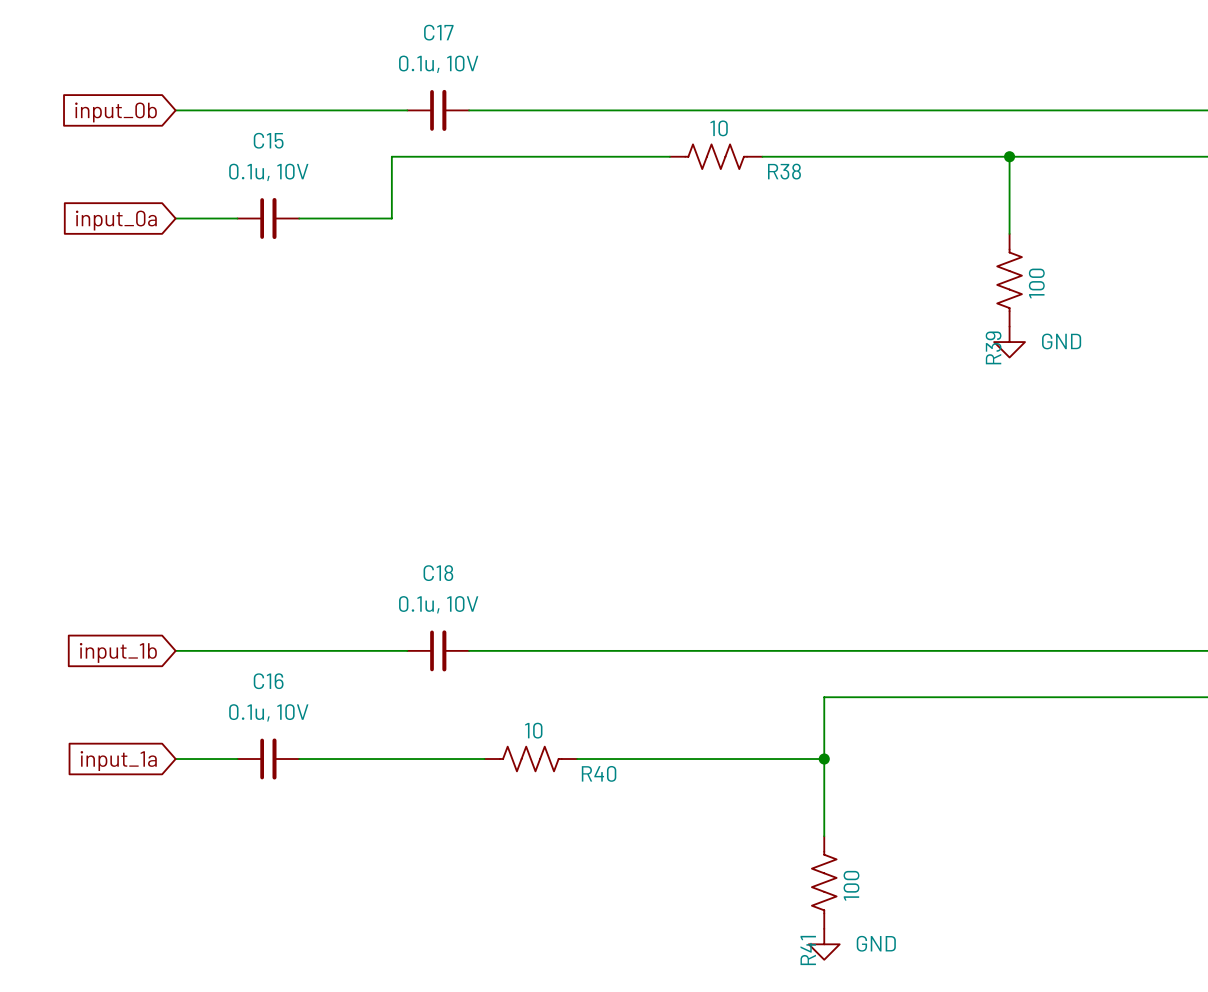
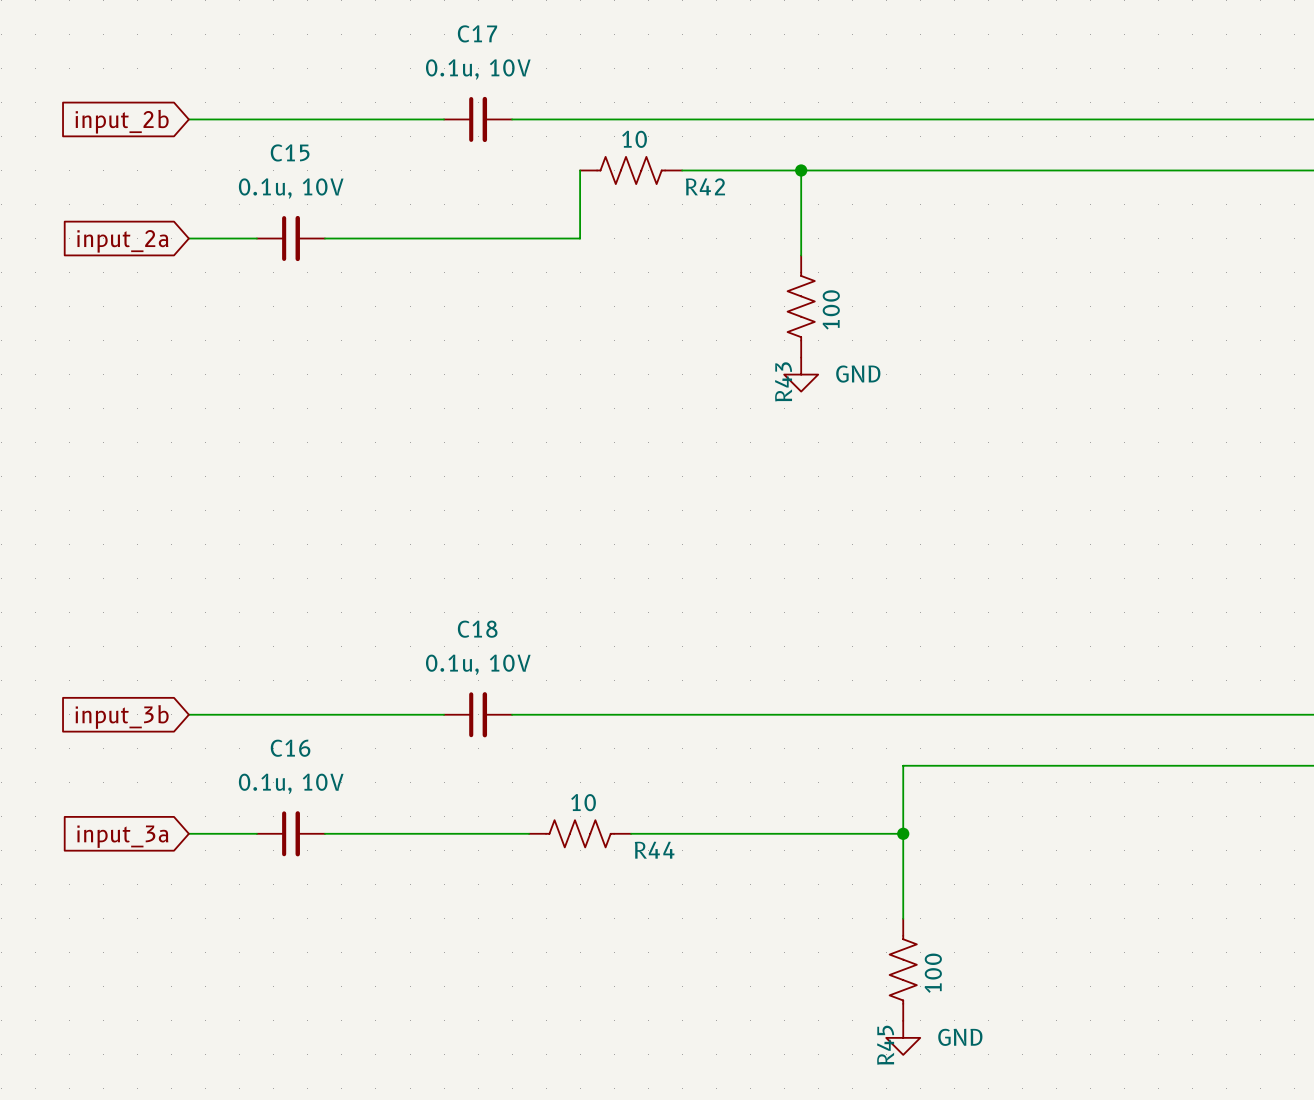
global label: input_0b (116, 112) -> input_2b (122, 121)
R42: none -> 10 (631, 170)
wire: (623, 156) (391, 156) (391, 218) -> (580, 170) (580, 238) (427, 238)
R38: 10 (716, 156) -> none
junction: none -> (801, 170)
wire: (1009, 156) (1009, 233) -> (801, 170) (801, 255)
junction: (1009, 156) -> none
global label: input_0a (116, 220) -> input_2a (122, 241)
R43: none -> 100 (801, 306)
R39: 100 (1009, 280) -> none
power symbol position: GND (1009, 342) -> GND (801, 374)
global label: input_1b (118, 652) -> input_3b (122, 716)
global label: input_1a (118, 761) -> input_3a (122, 836)
R40 name: R40 (599, 773) -> R44 (654, 850)
R41 name: R41 (808, 950) -> R45 (885, 1045)

